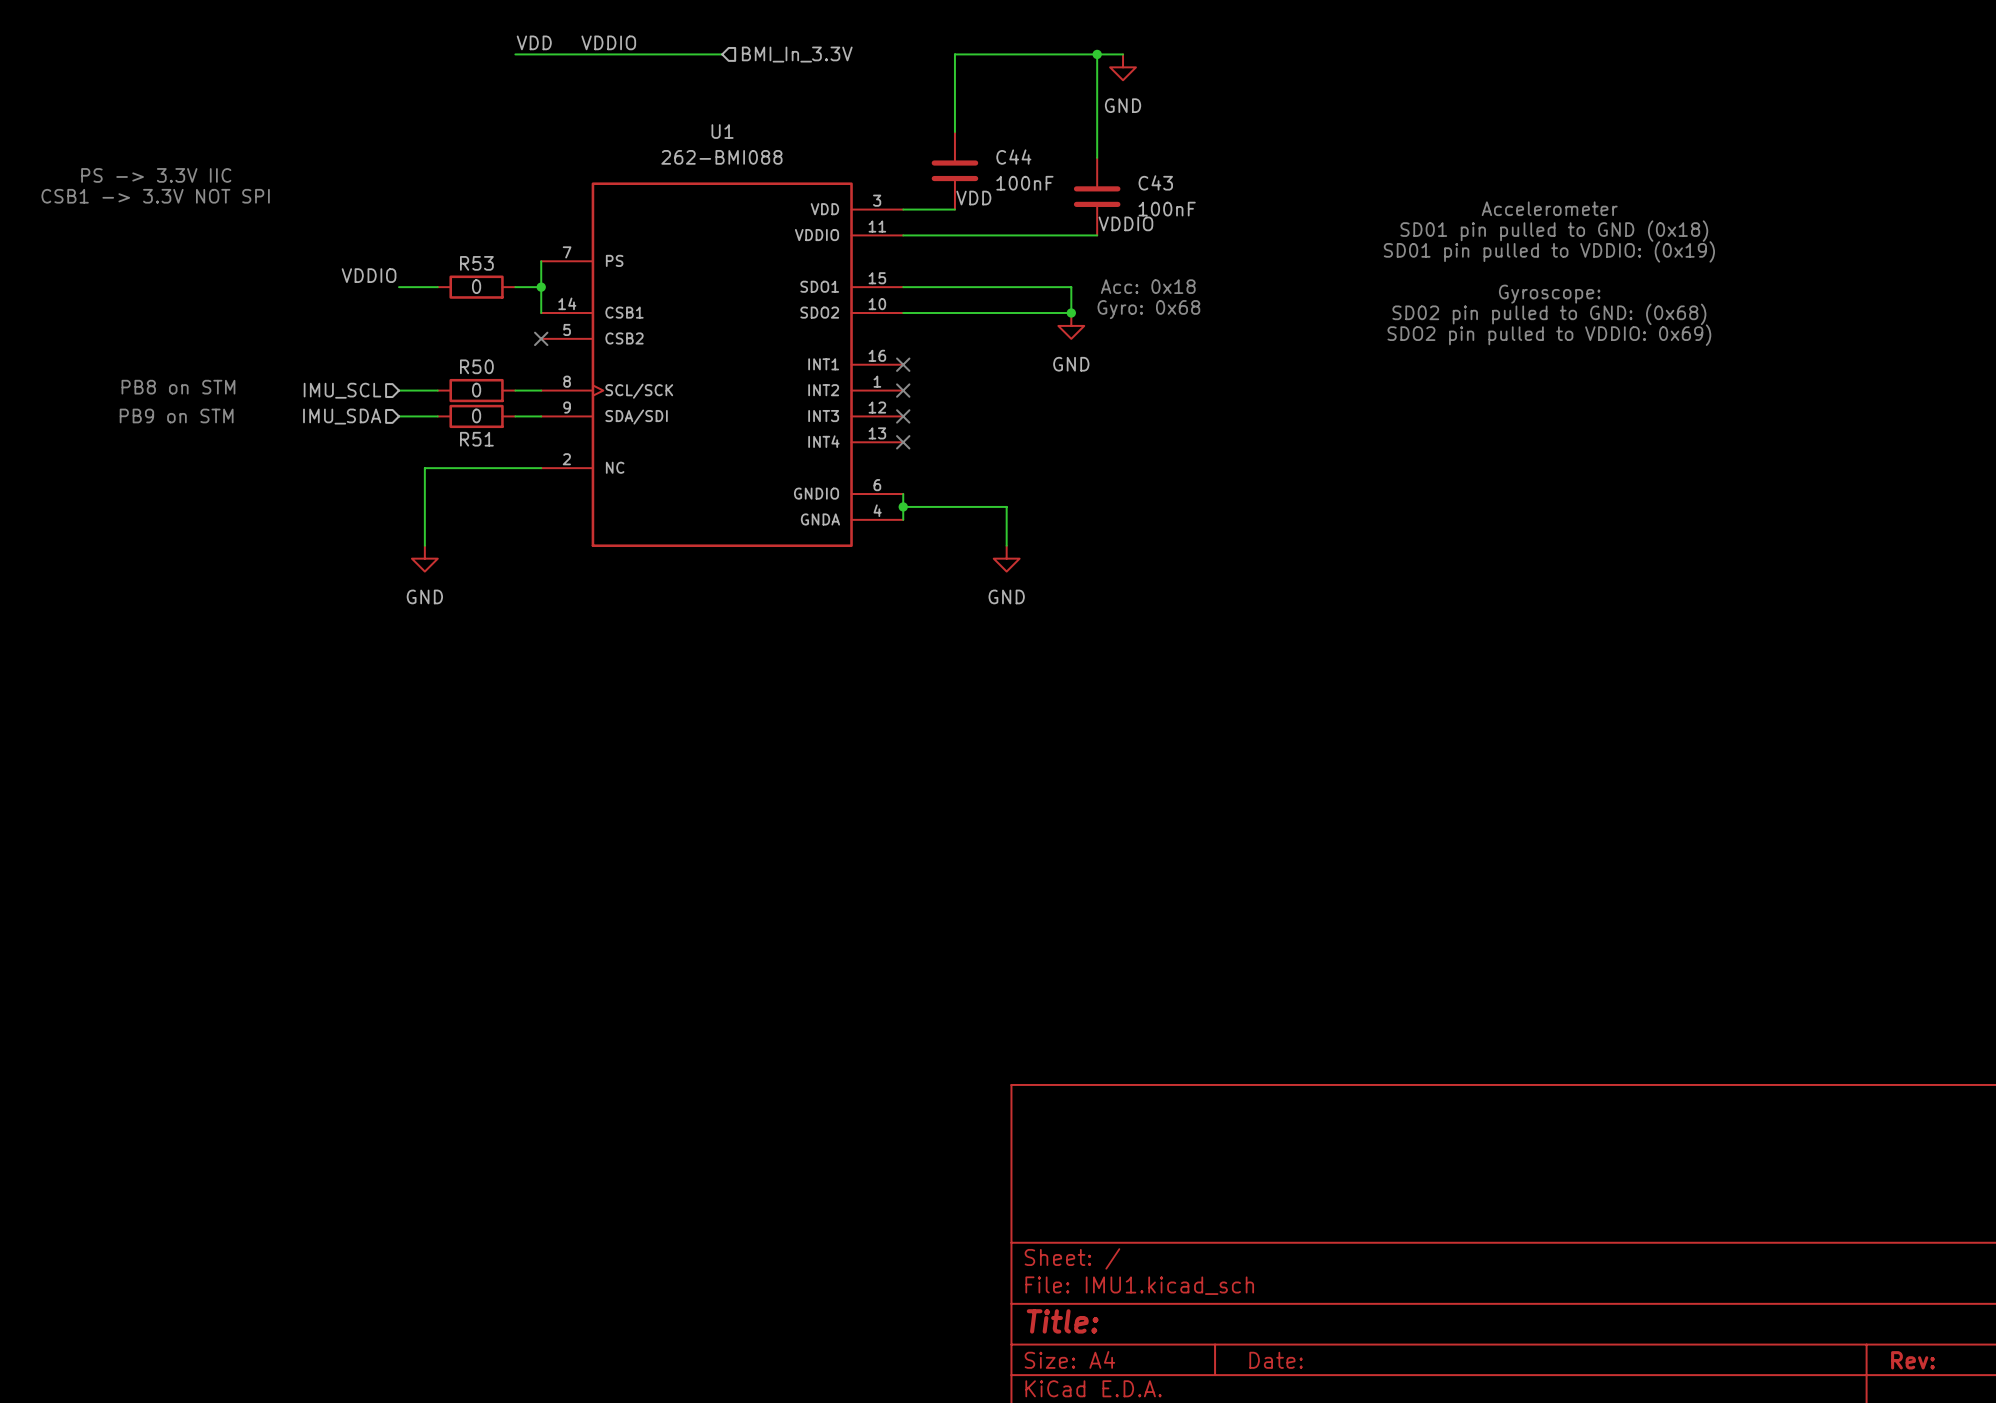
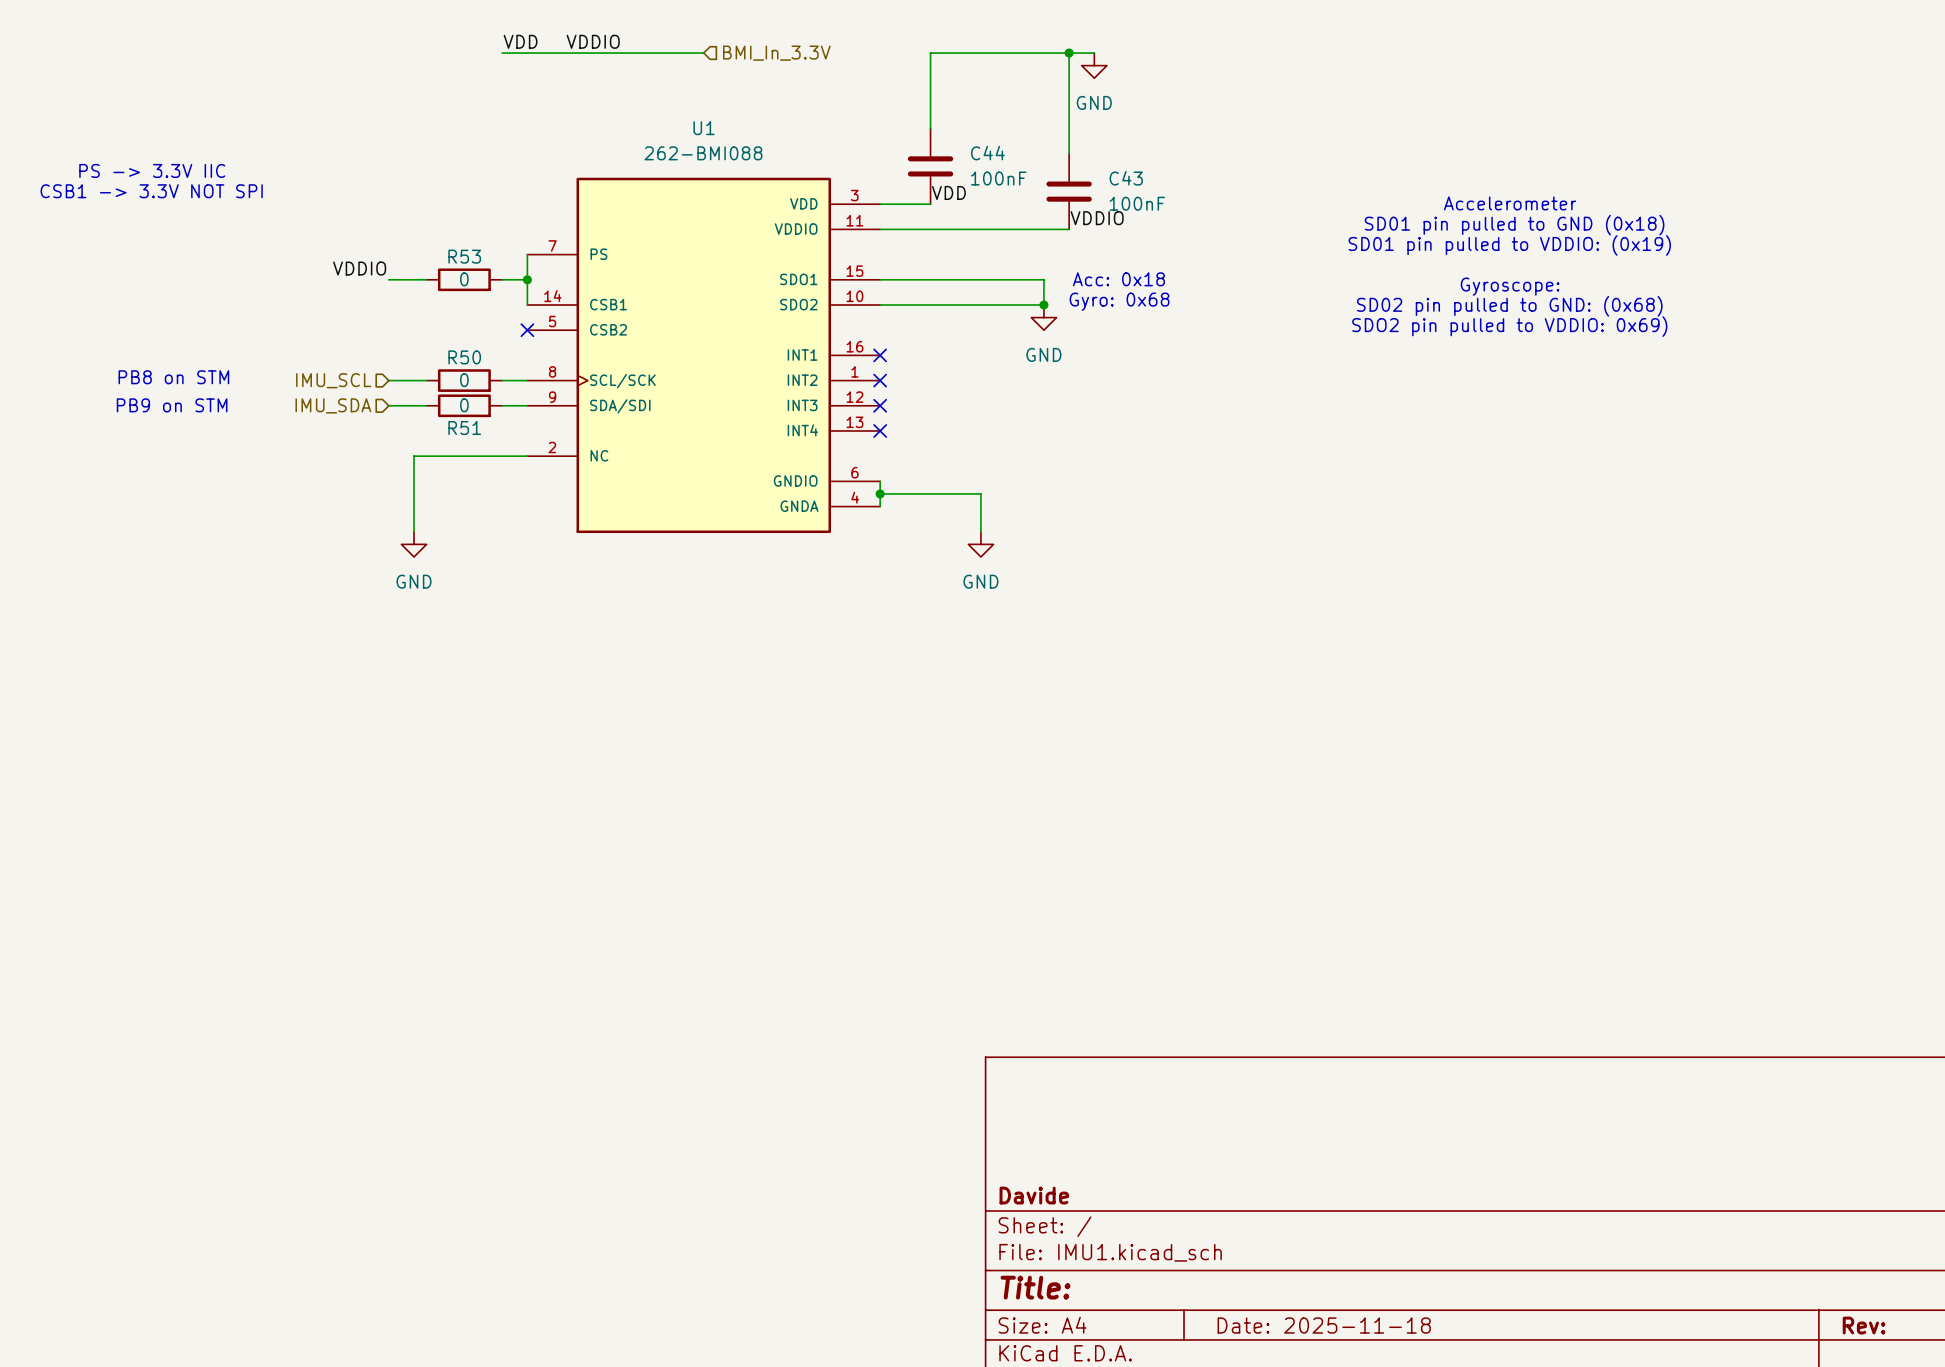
title block: none -> Davide (1034, 1195)
title block: Date: (1276, 1360) -> Date: 2025-11-18 (1324, 1325)

